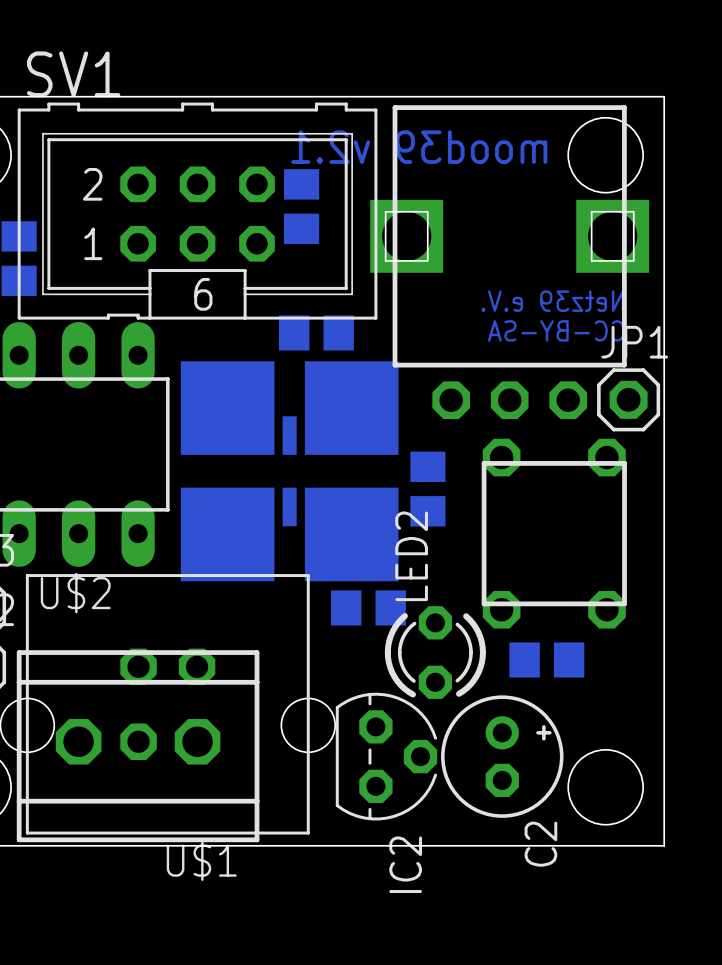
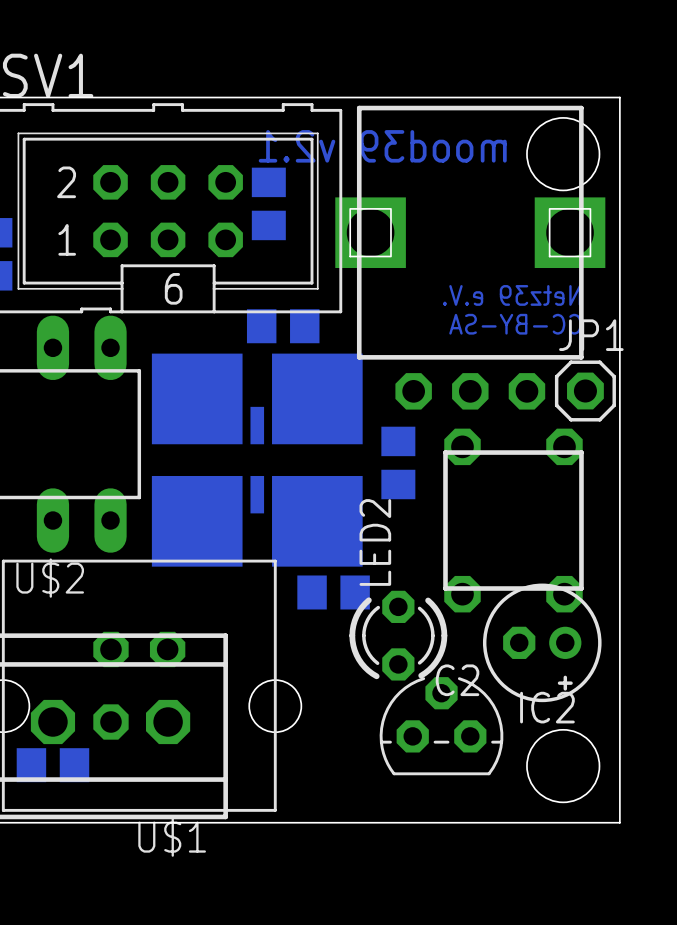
part position: (427, 489) -> (398, 462)
part position: (546, 659) -> (52, 765)
C2 footprint: [441, 695, 564, 818] -> [482, 583, 602, 703]
IC2 rotation: 0° (386, 756) -> 90° counterclockwise (441, 726)
IC2 position: (386, 756) -> (441, 726)
C2 name position: C2 (540, 844) -> C2 (457, 680)

